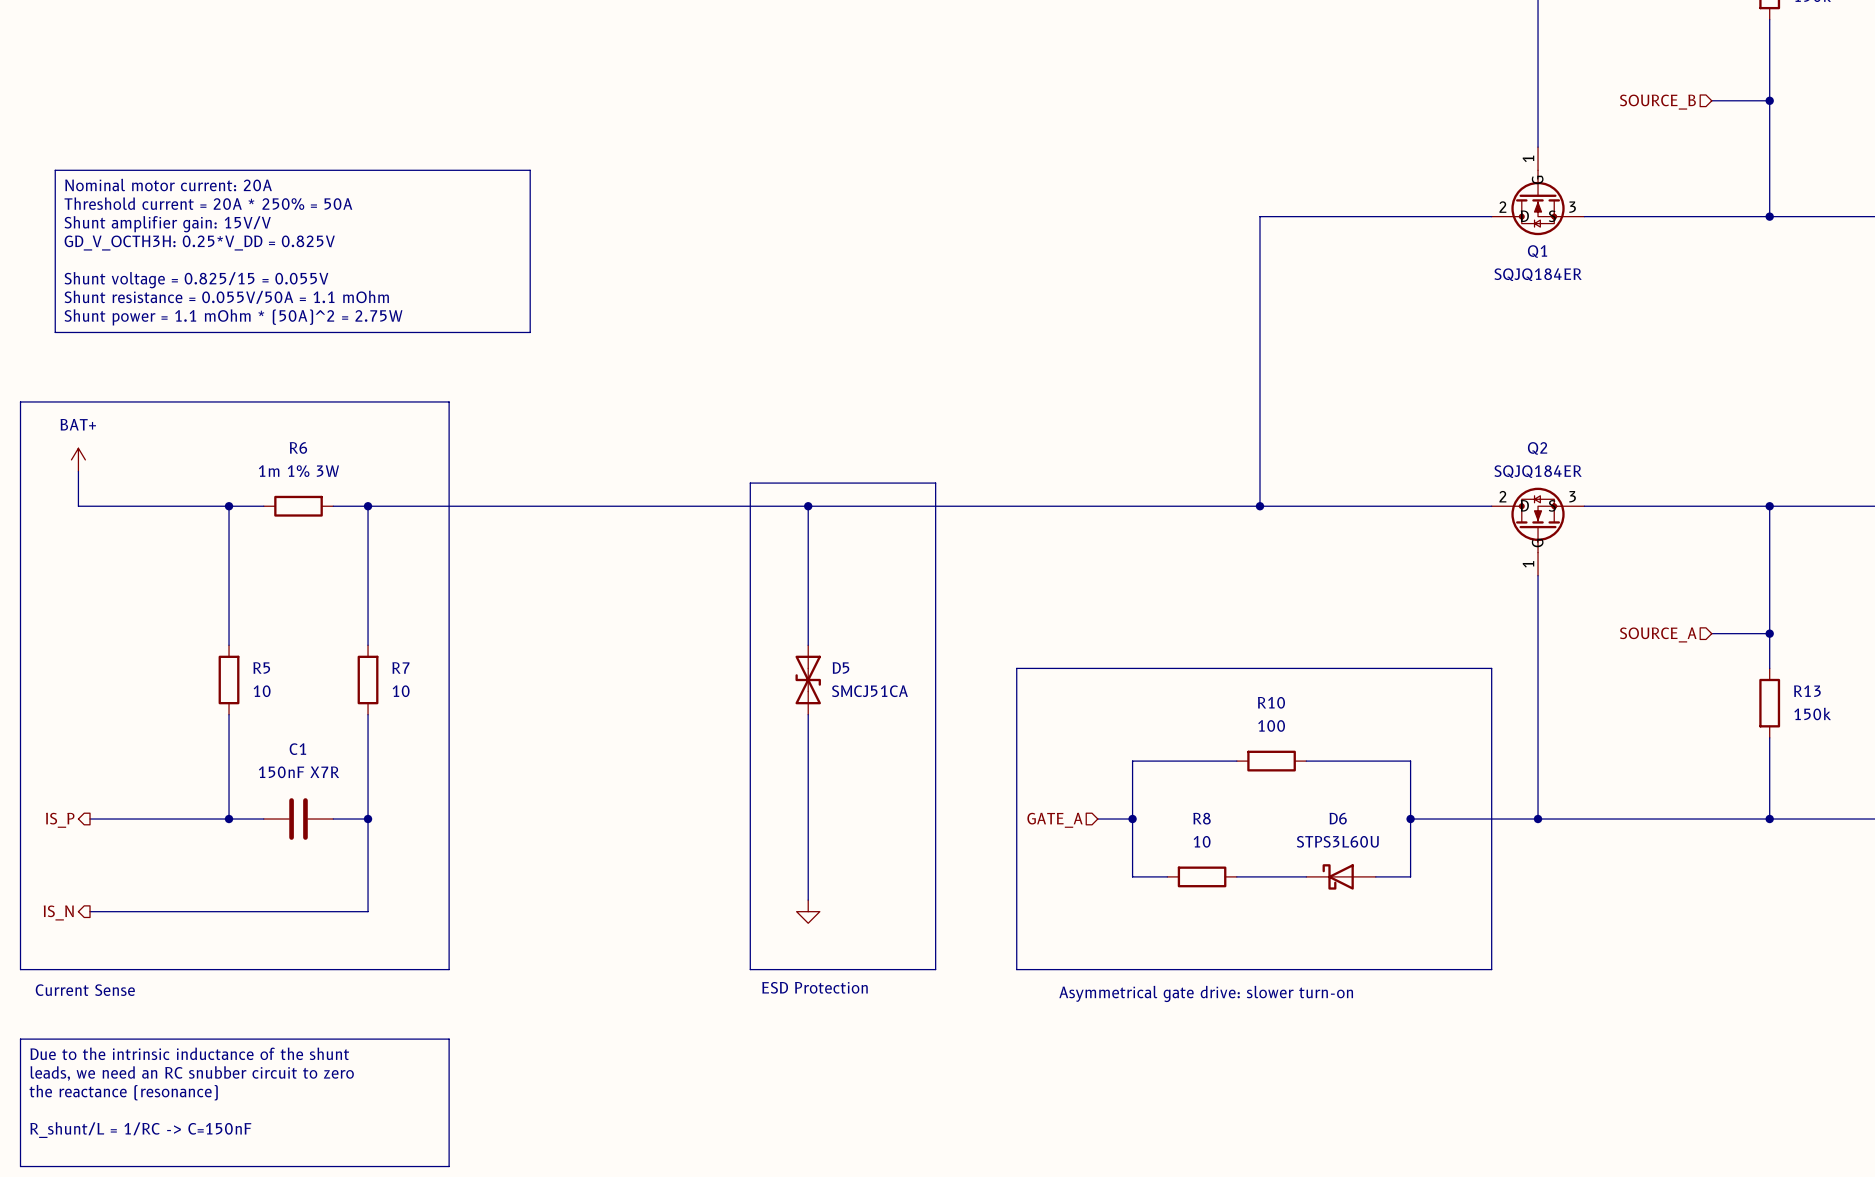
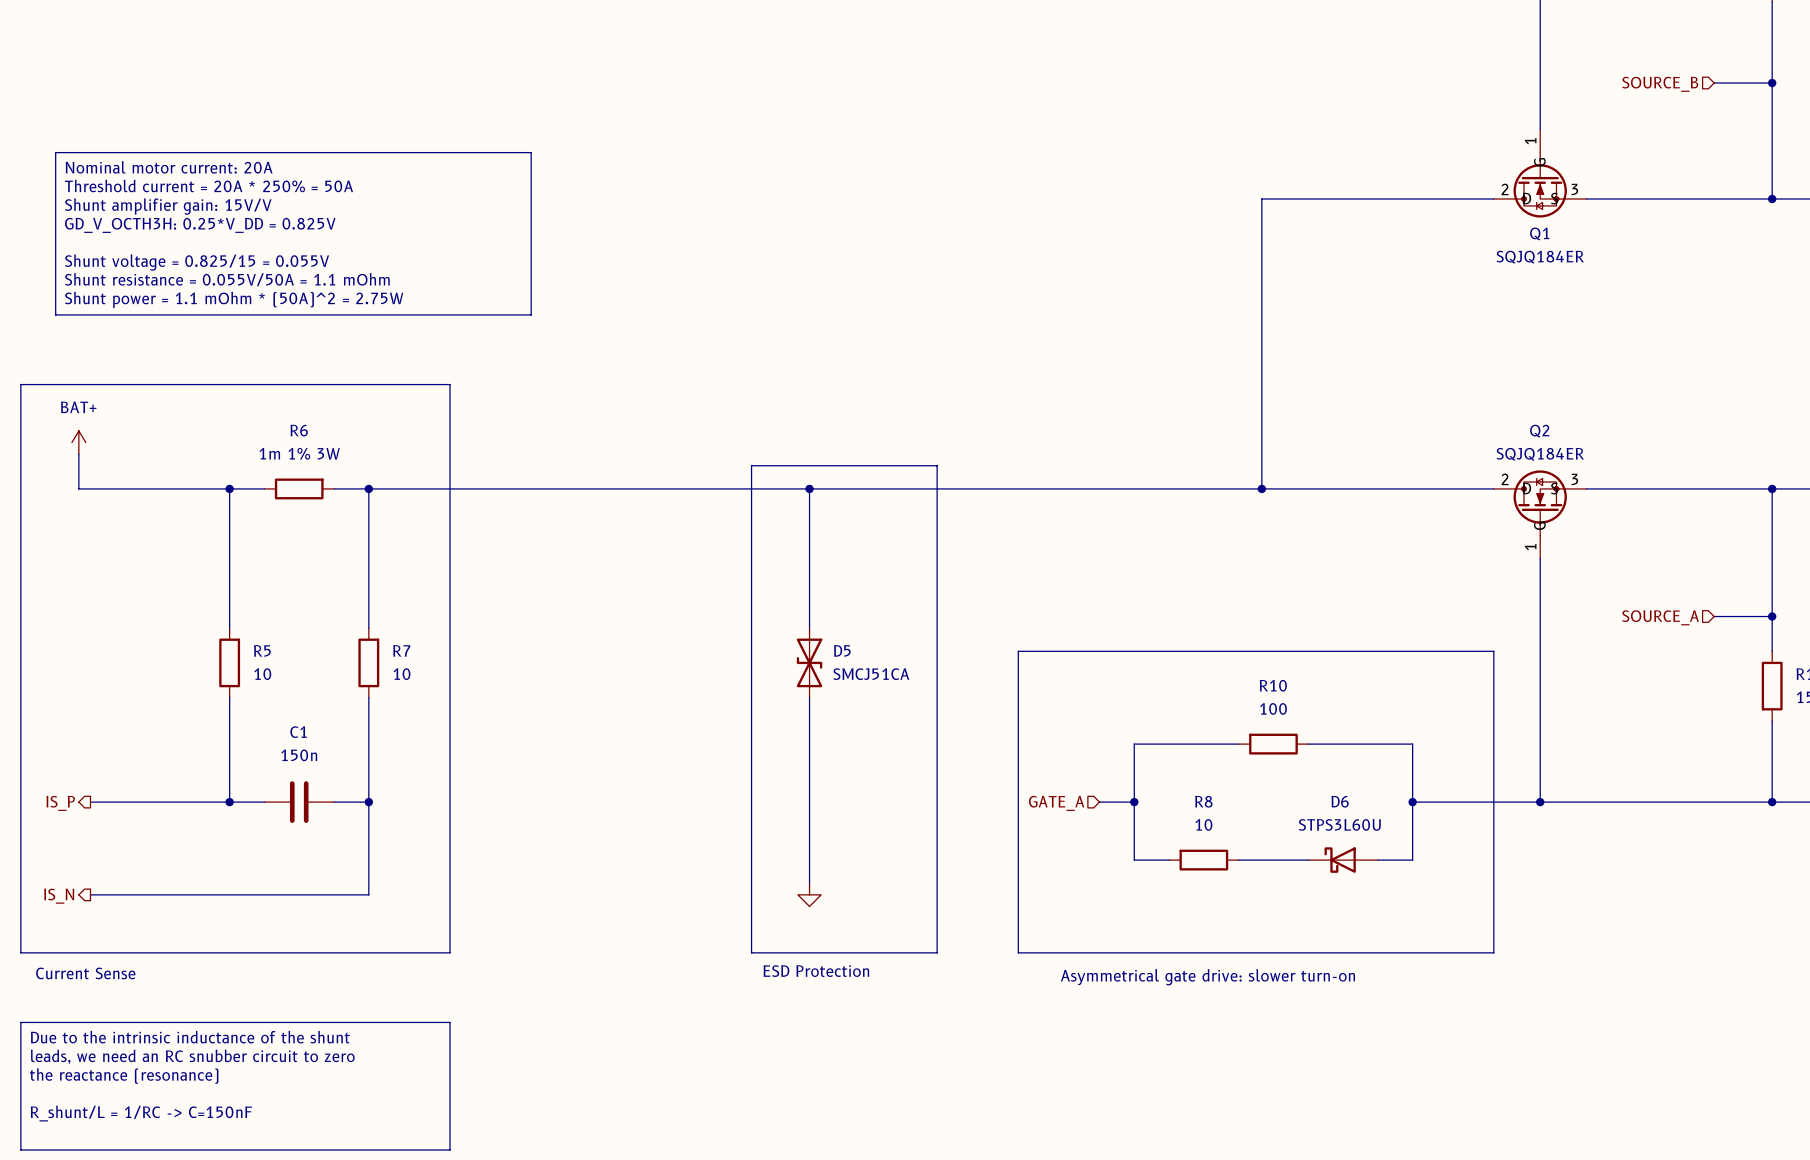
C1 value: 150nF X7R (299, 772) -> 150n (299, 755)

